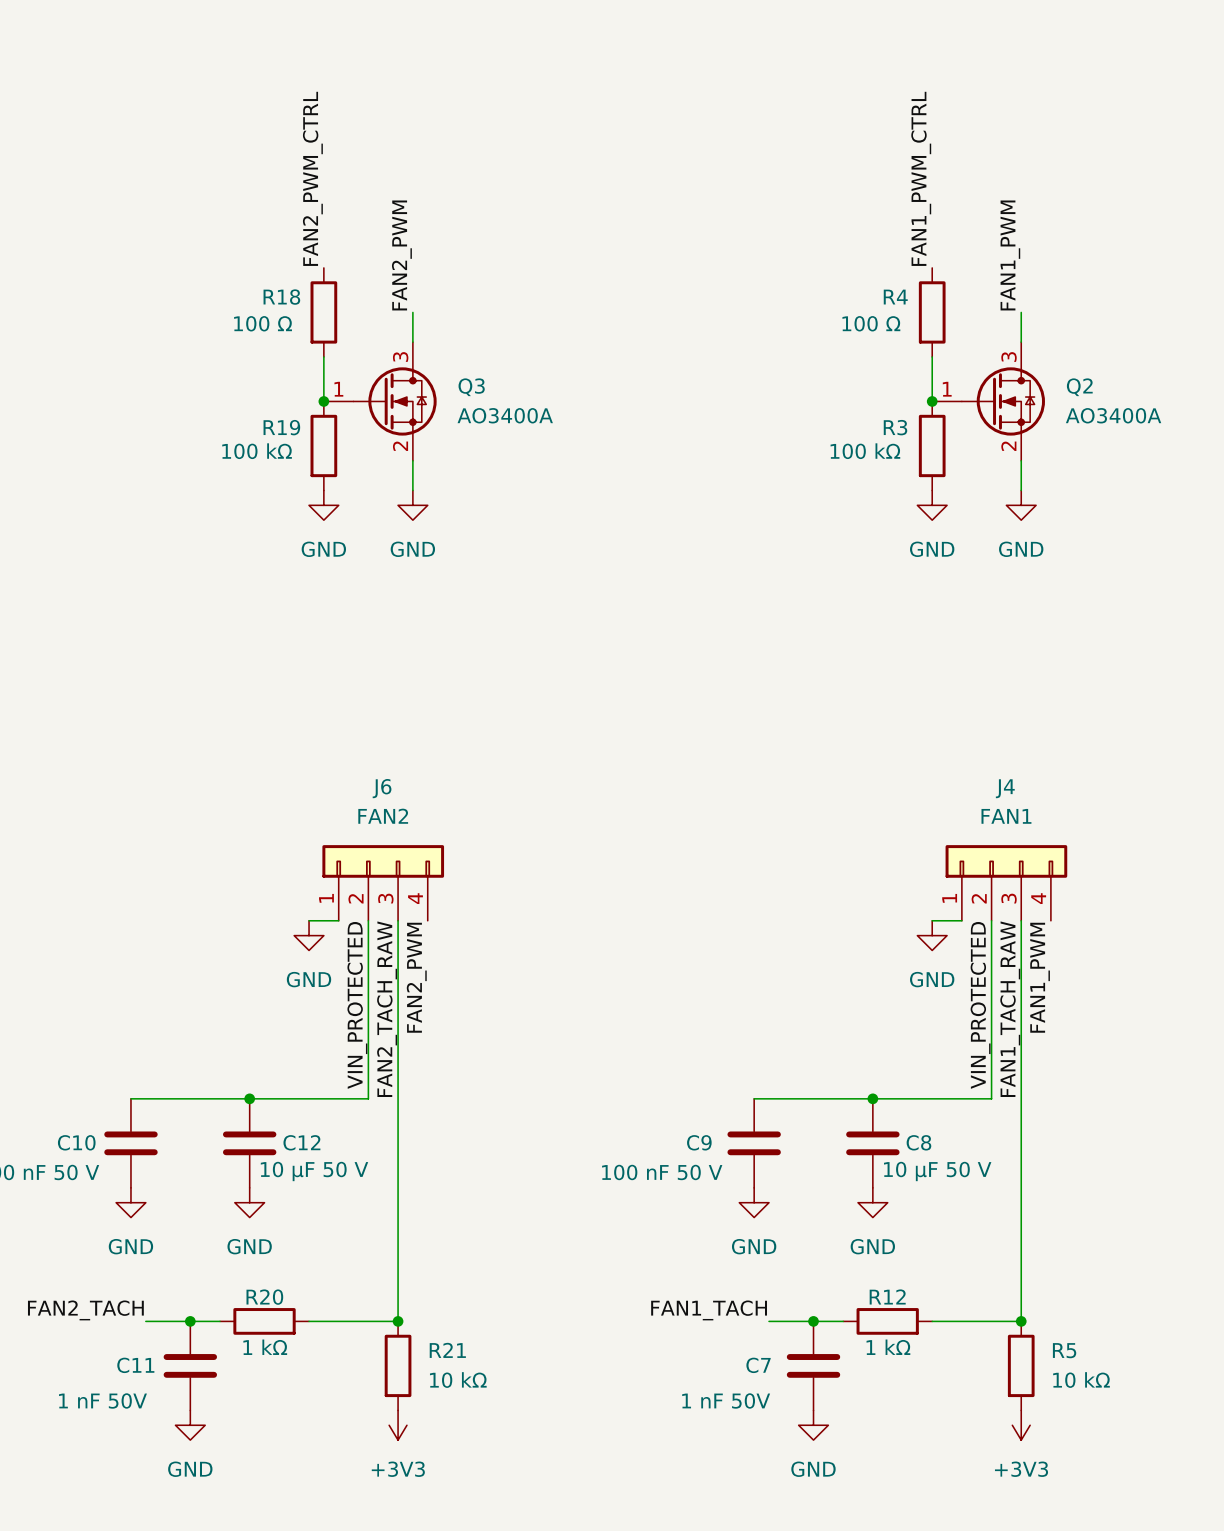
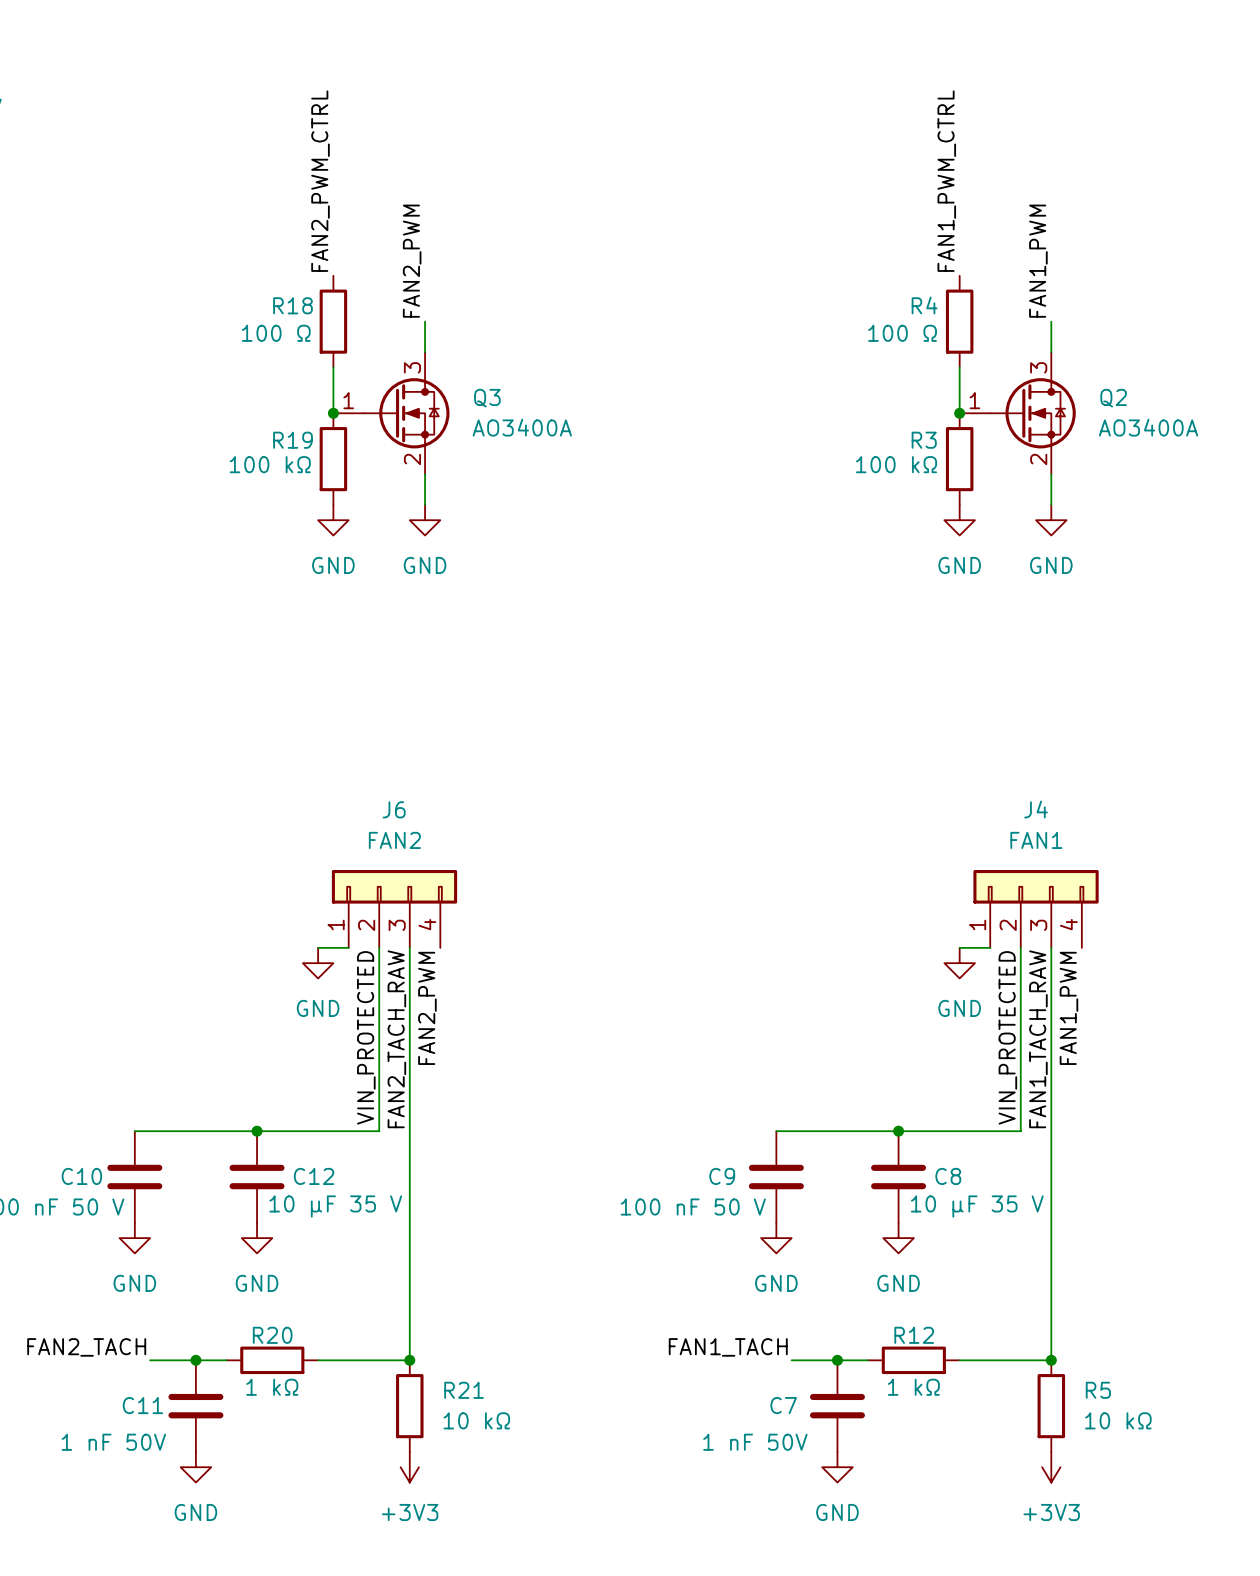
C12 value: 10 µF 50 V (314, 1171) -> 10 µF 35 V (335, 1206)
C8 value: 10 µF 50 V (937, 1171) -> 10 µF 35 V (977, 1206)

